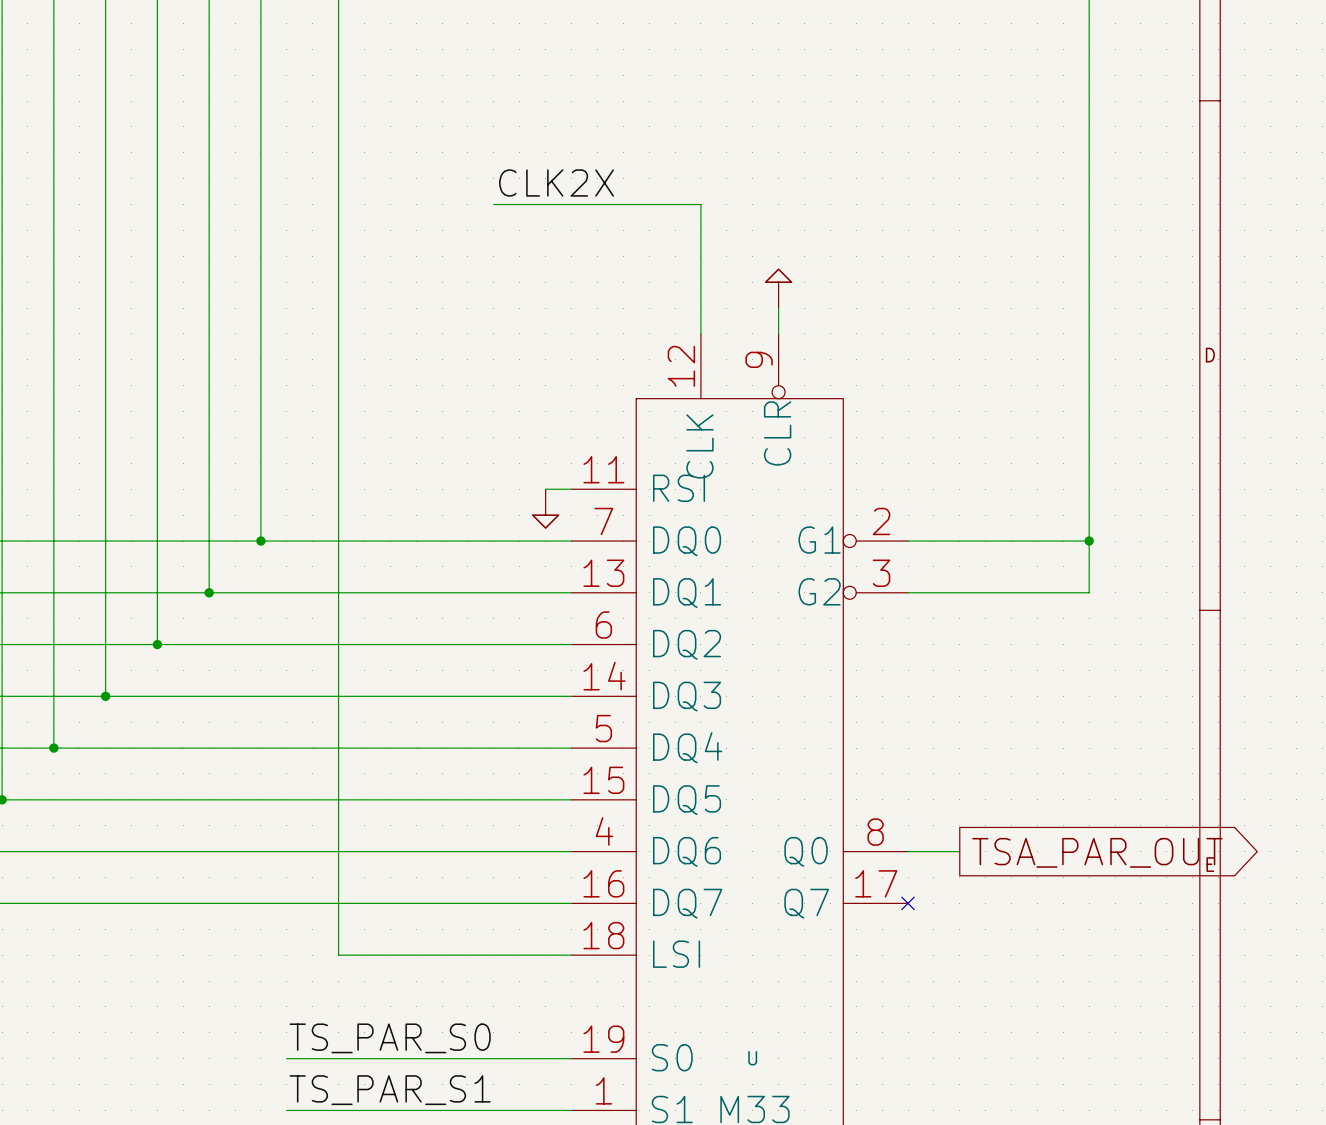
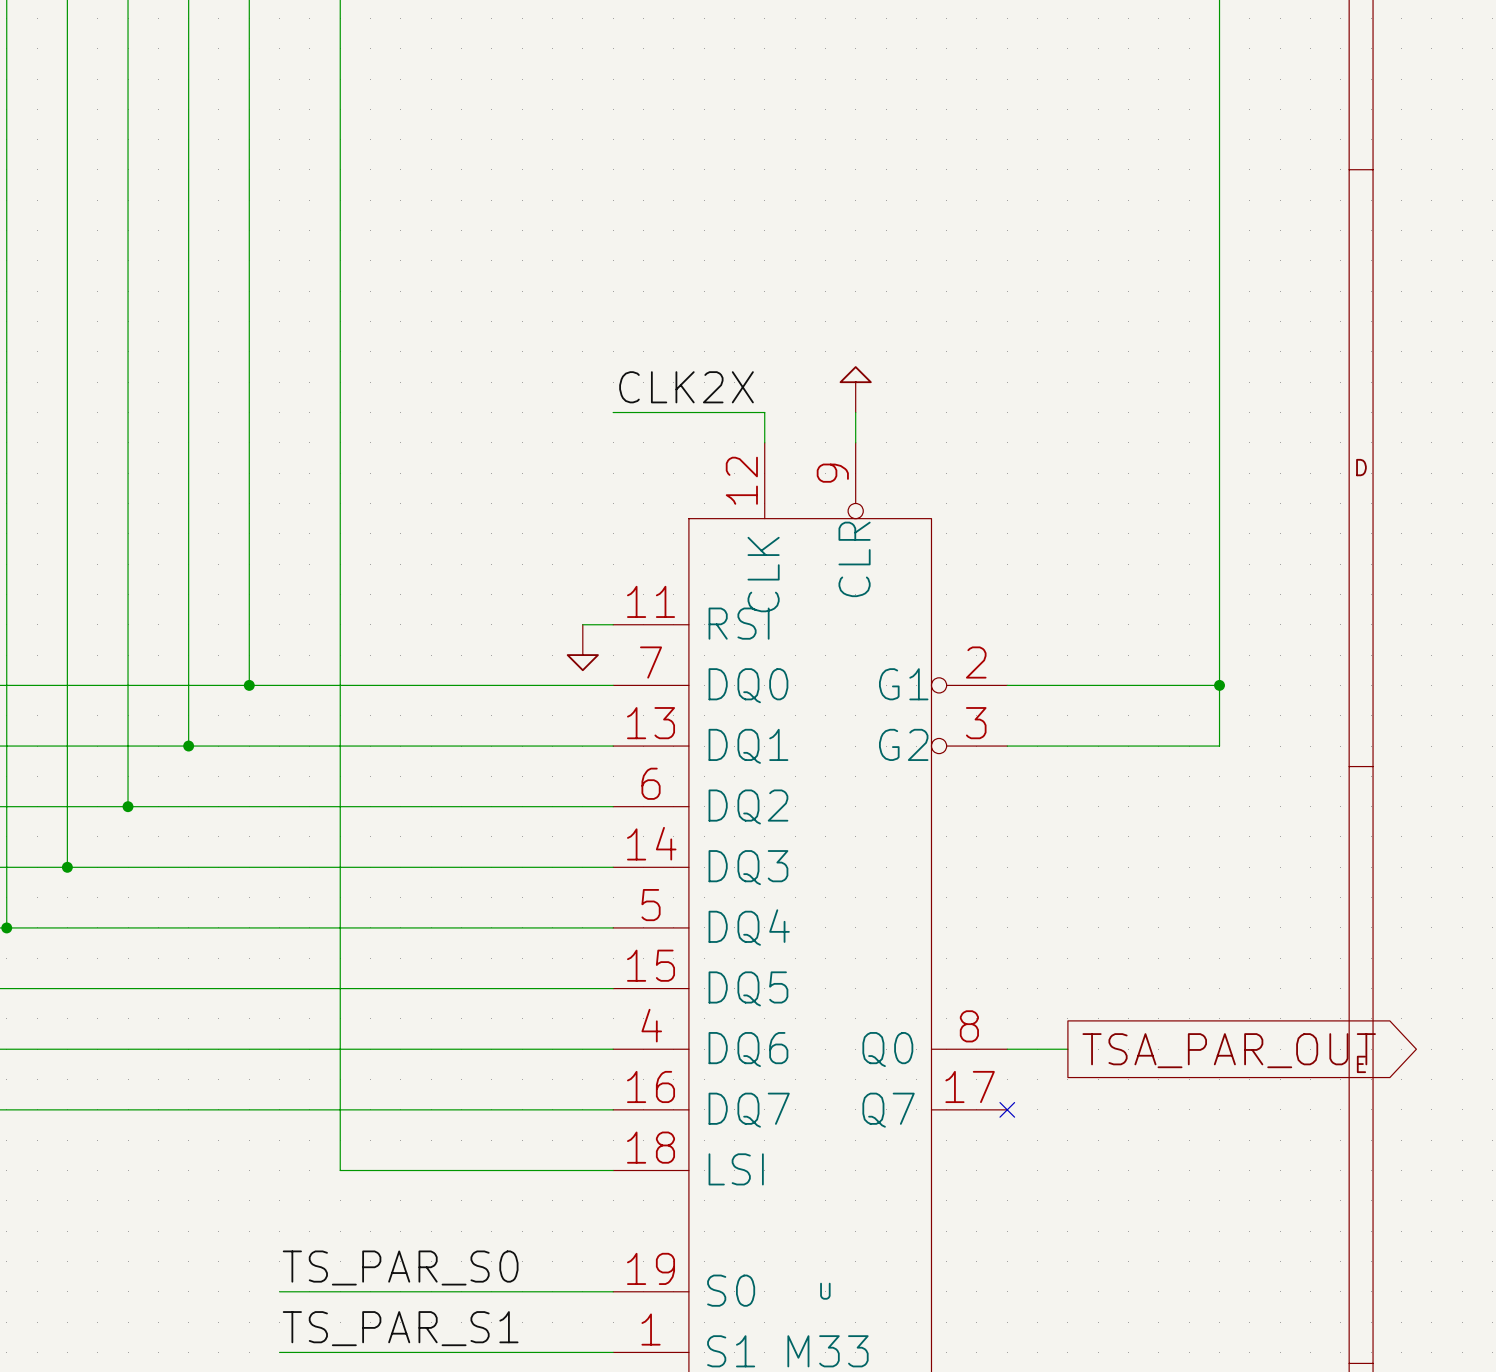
label position: CLK2X (556, 182) -> CLK2X (686, 387)
wire: (493, 204) (700, 204) (700, 308) -> (613, 412) (764, 412)

